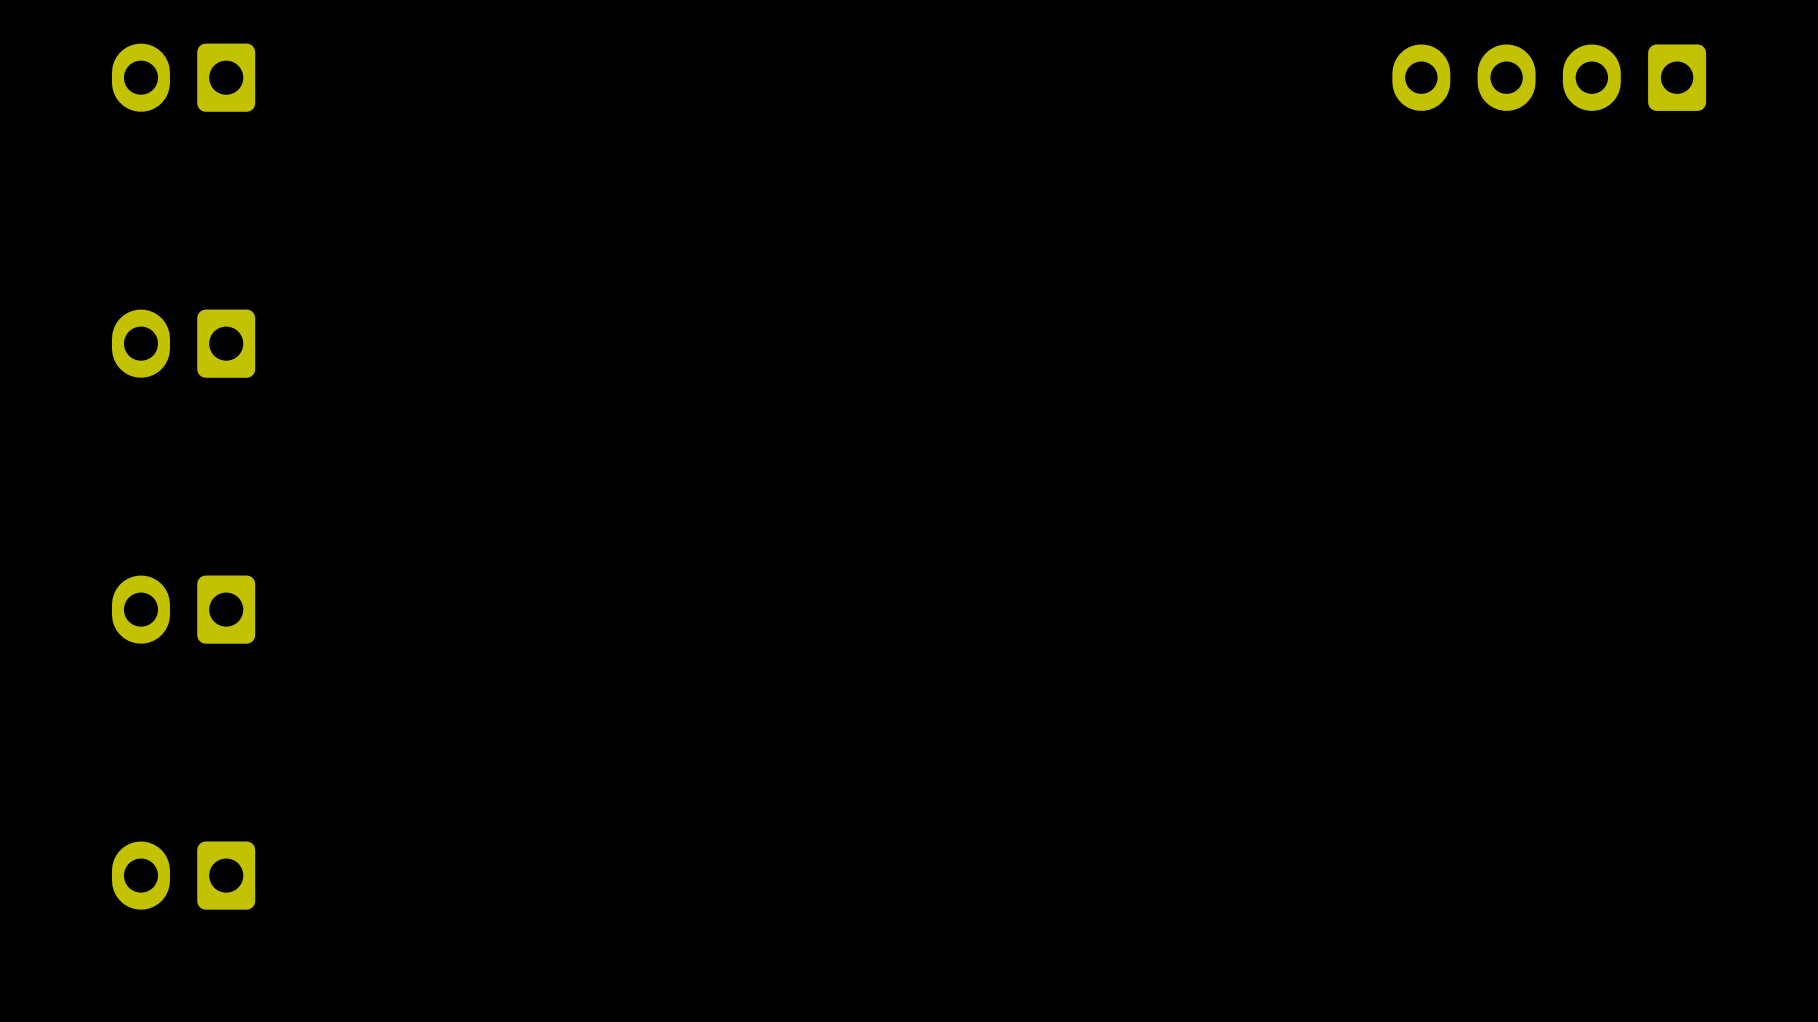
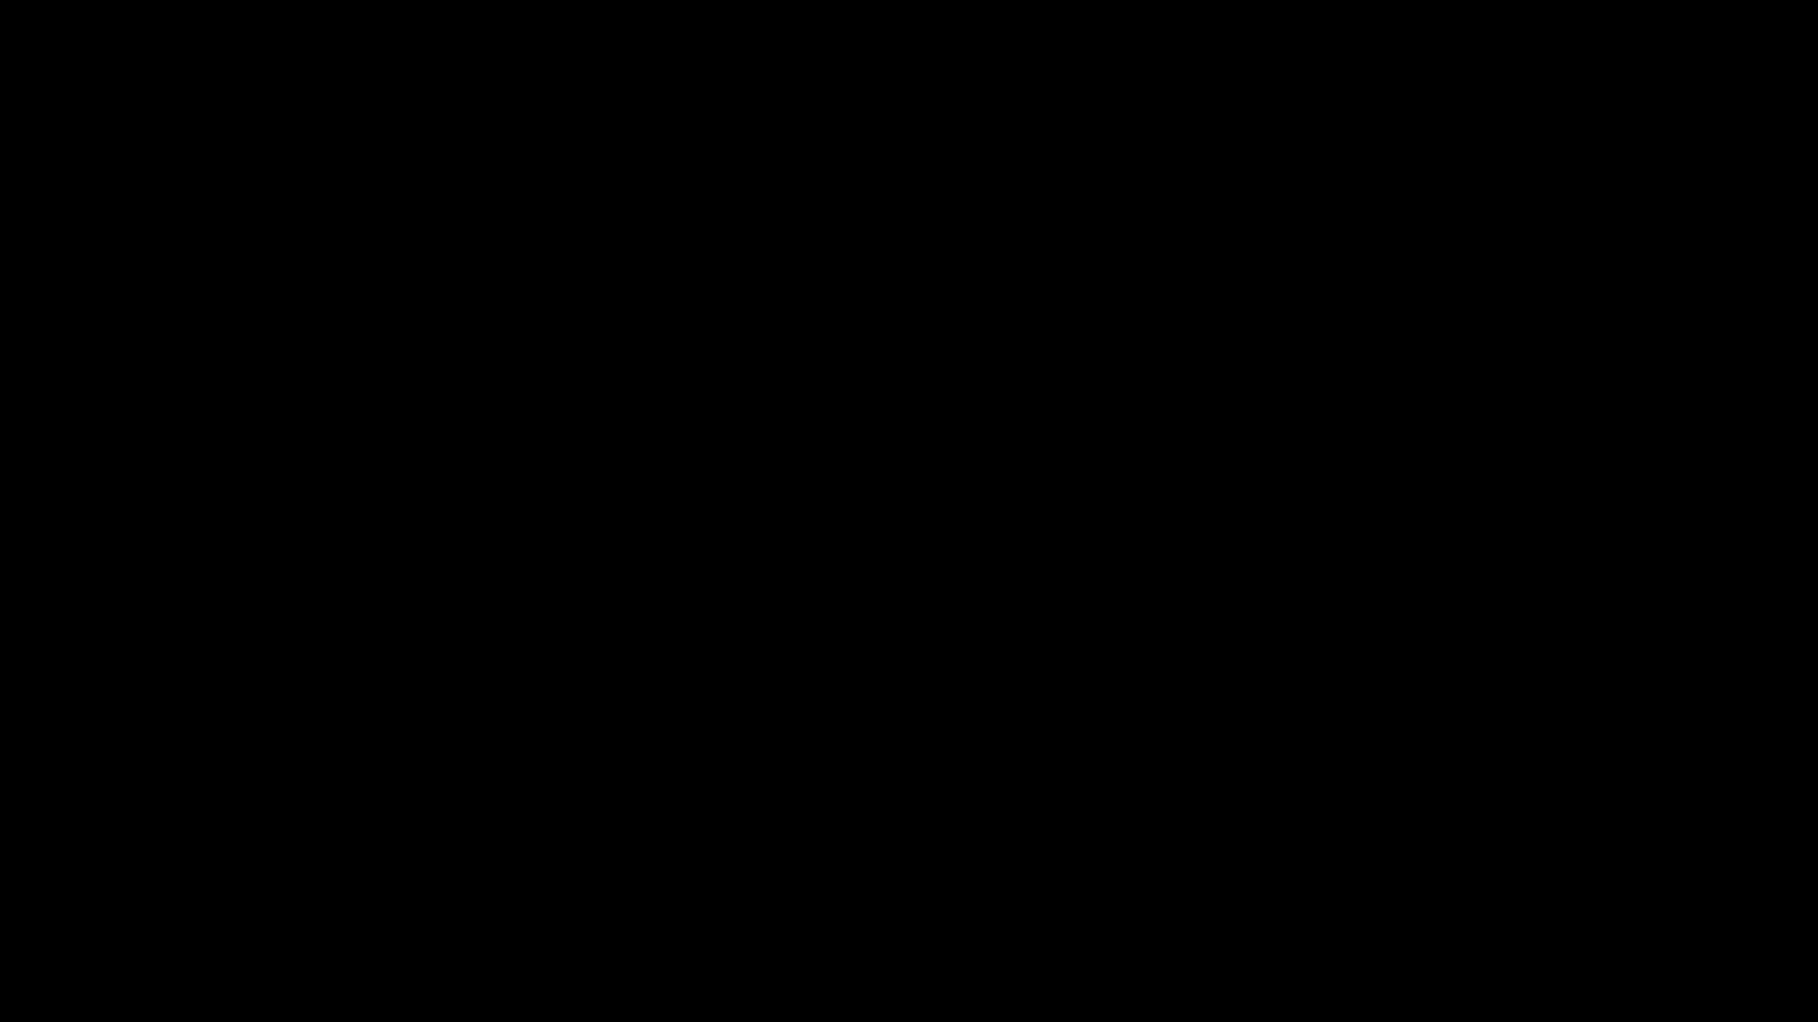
part: (183, 77) -> none
part: (1549, 77) -> none
part: (183, 343) -> none
part: (183, 609) -> none
part: (183, 875) -> none

